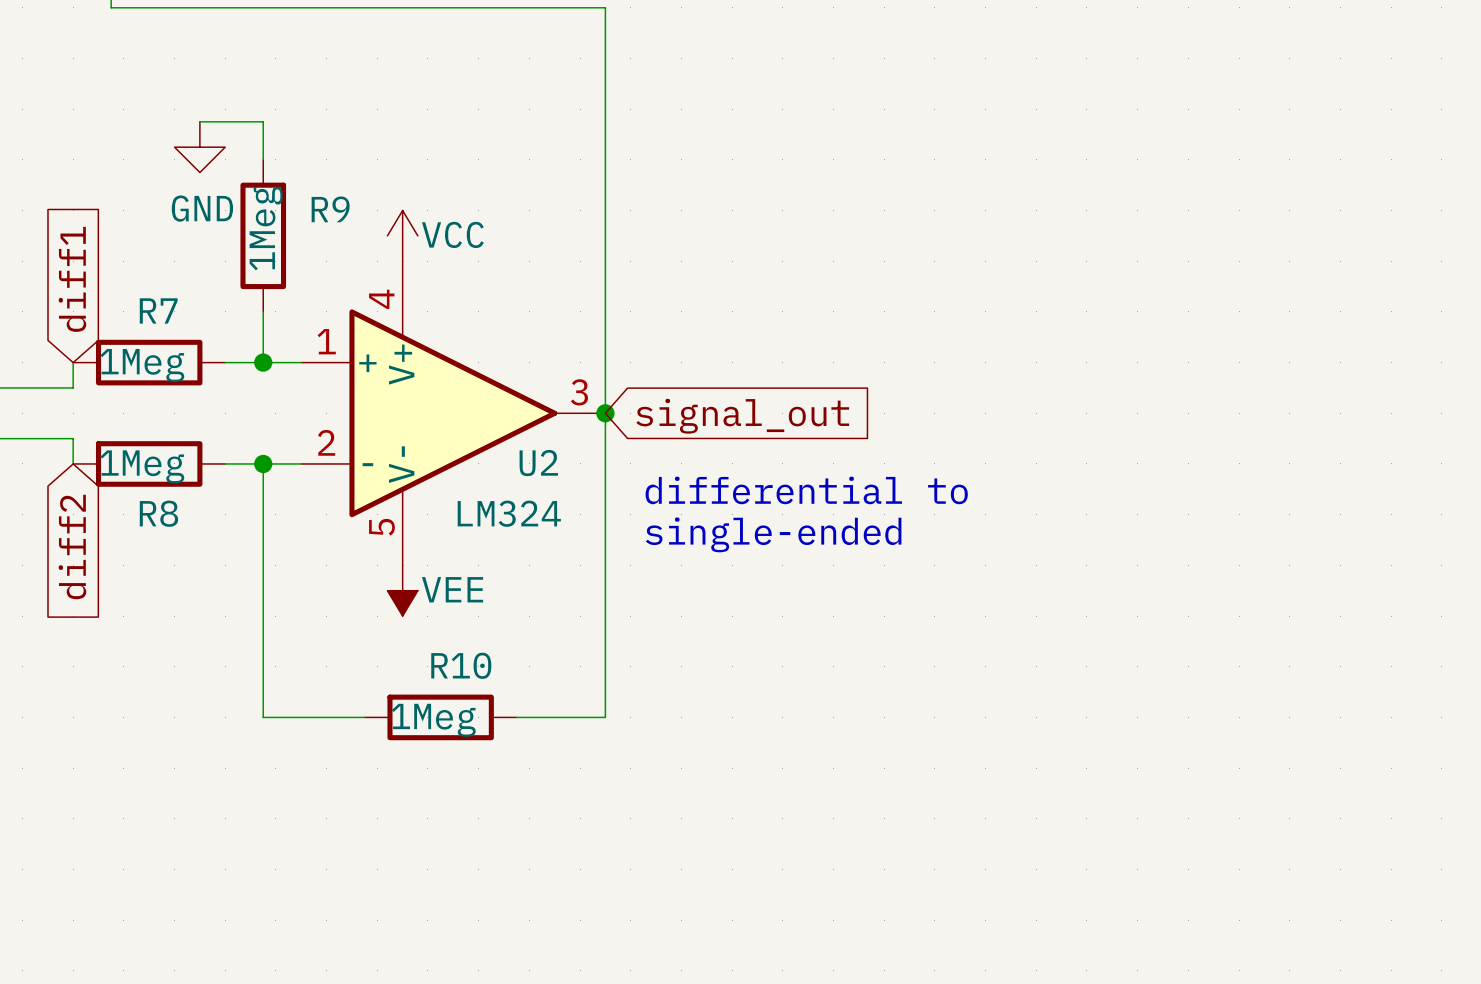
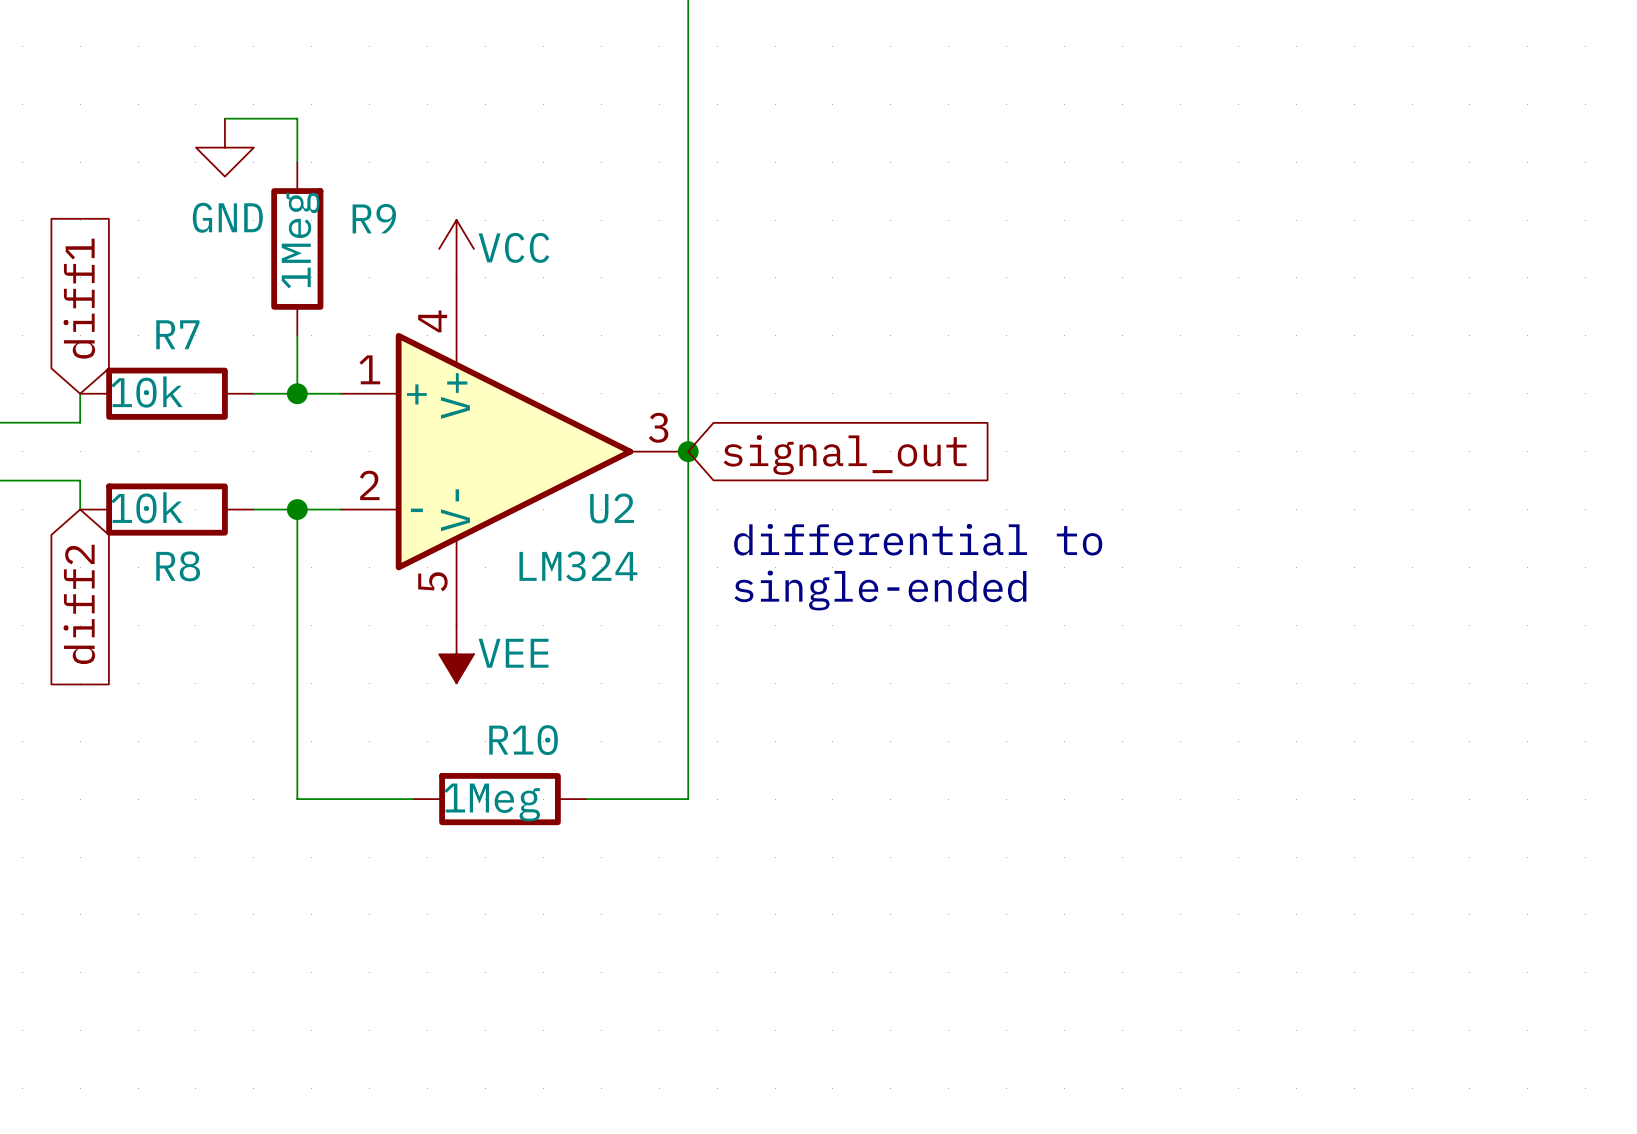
R7 value: 1Meg (142, 365) -> 10k (147, 392)
R8 value: 1Meg (142, 466) -> 10k (147, 507)

